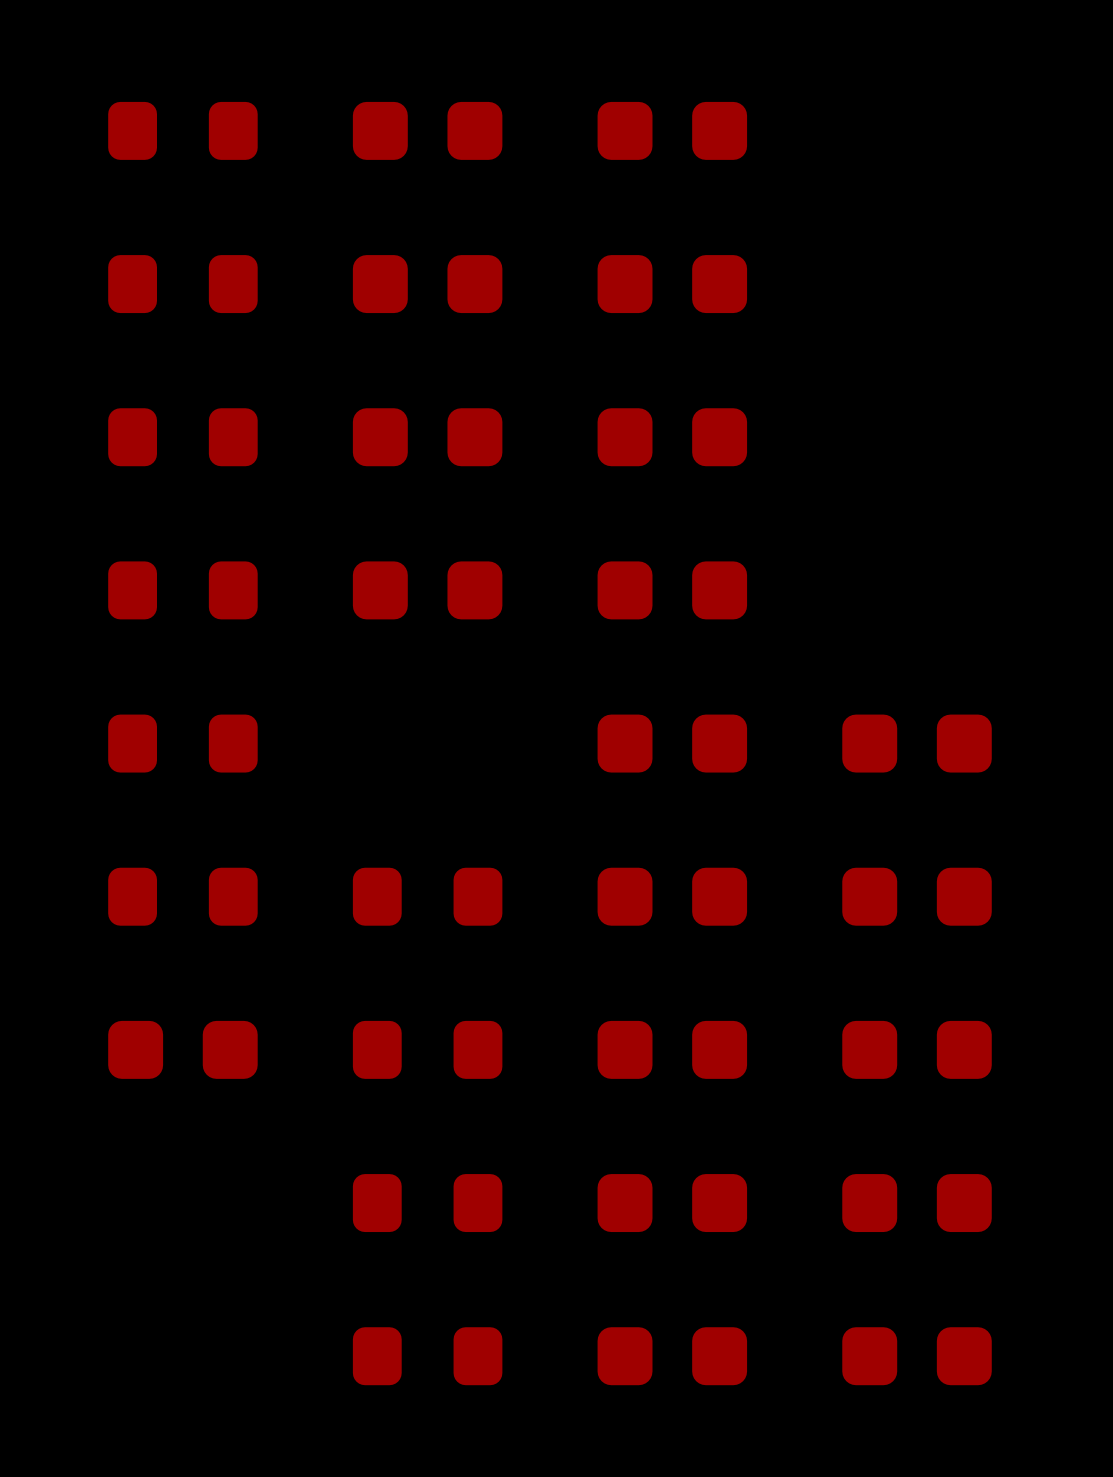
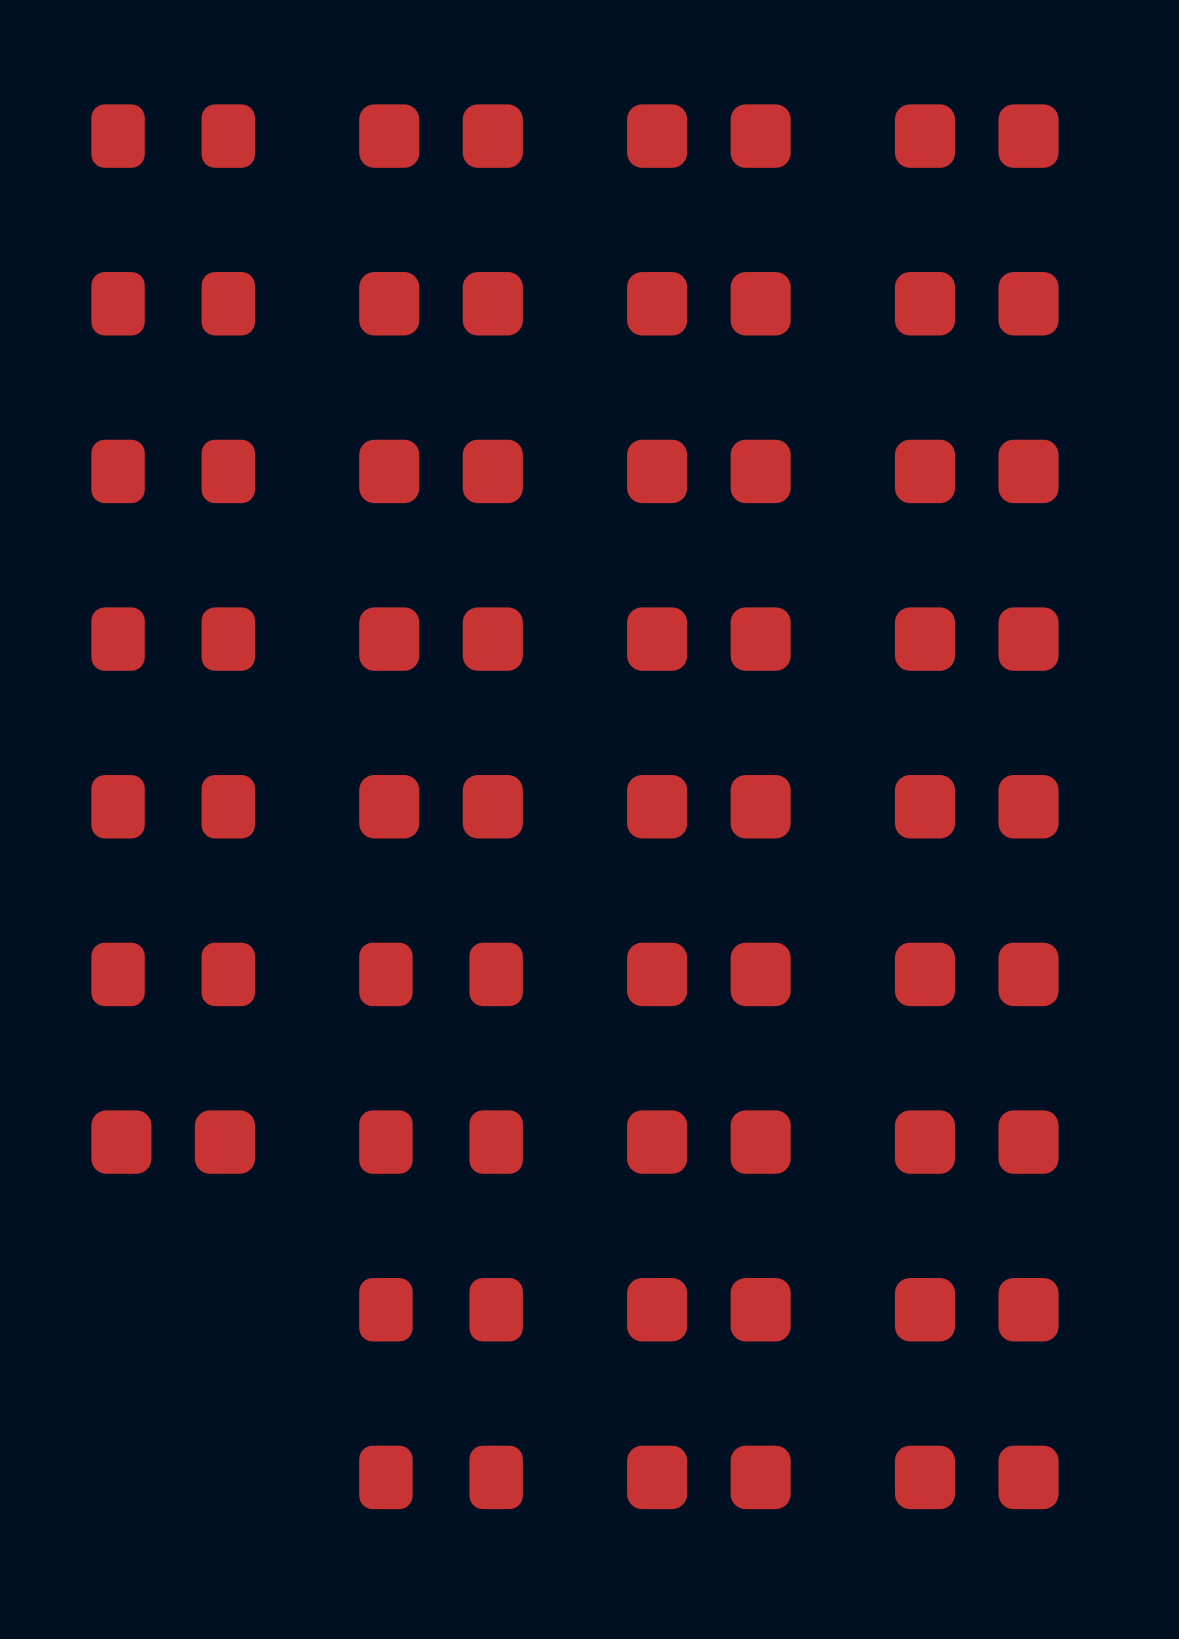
part: none -> (976, 136)
part: none -> (976, 303)
part: none -> (976, 471)
part: none -> (976, 639)
part: none -> (441, 806)

